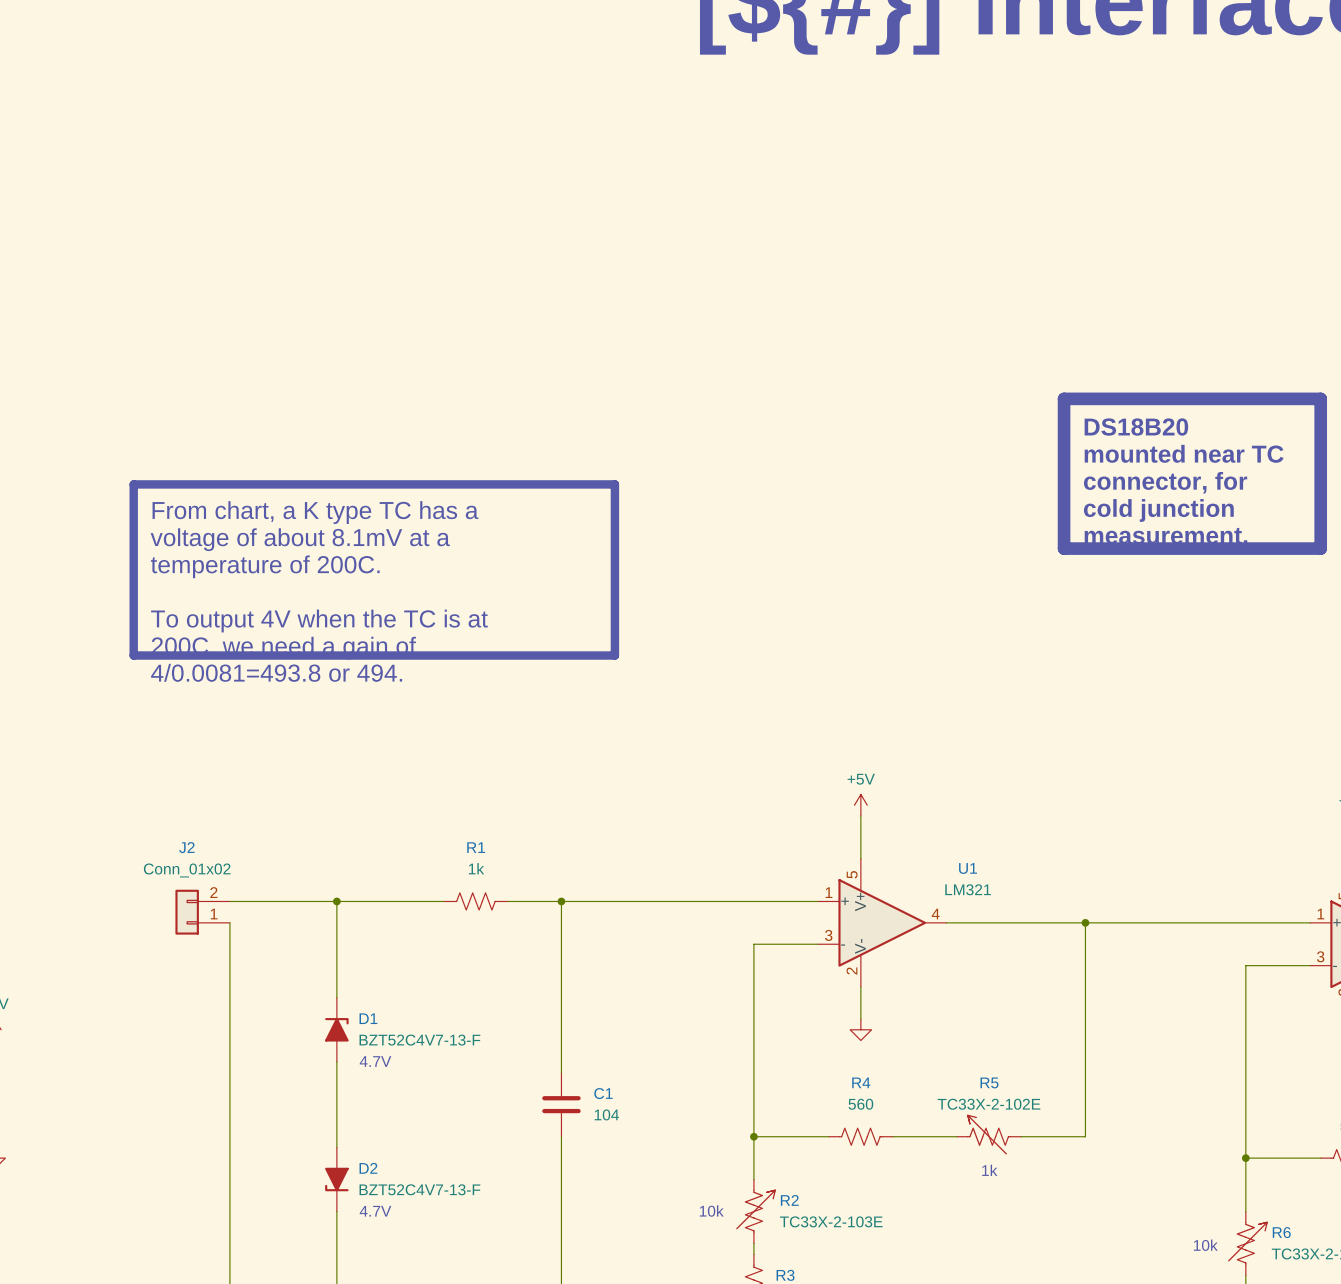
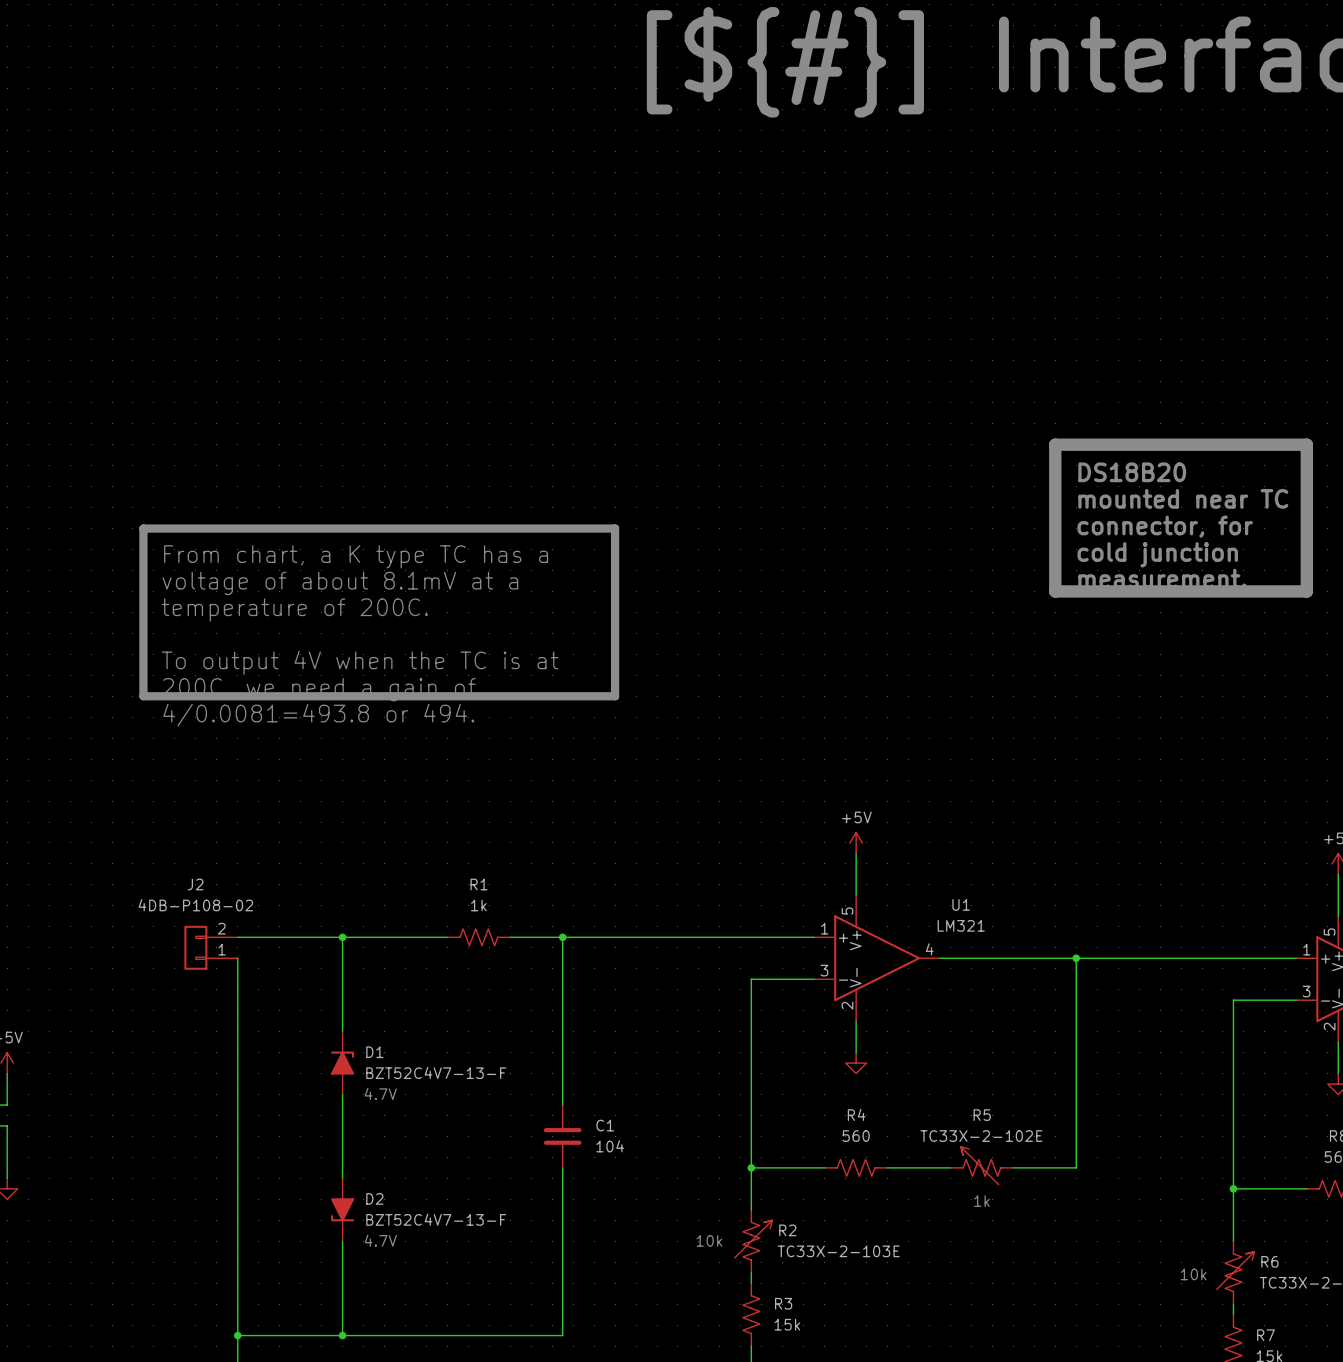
J2 value: Conn_01x02 (187, 870) -> 4DB-P108-02 (195, 905)

